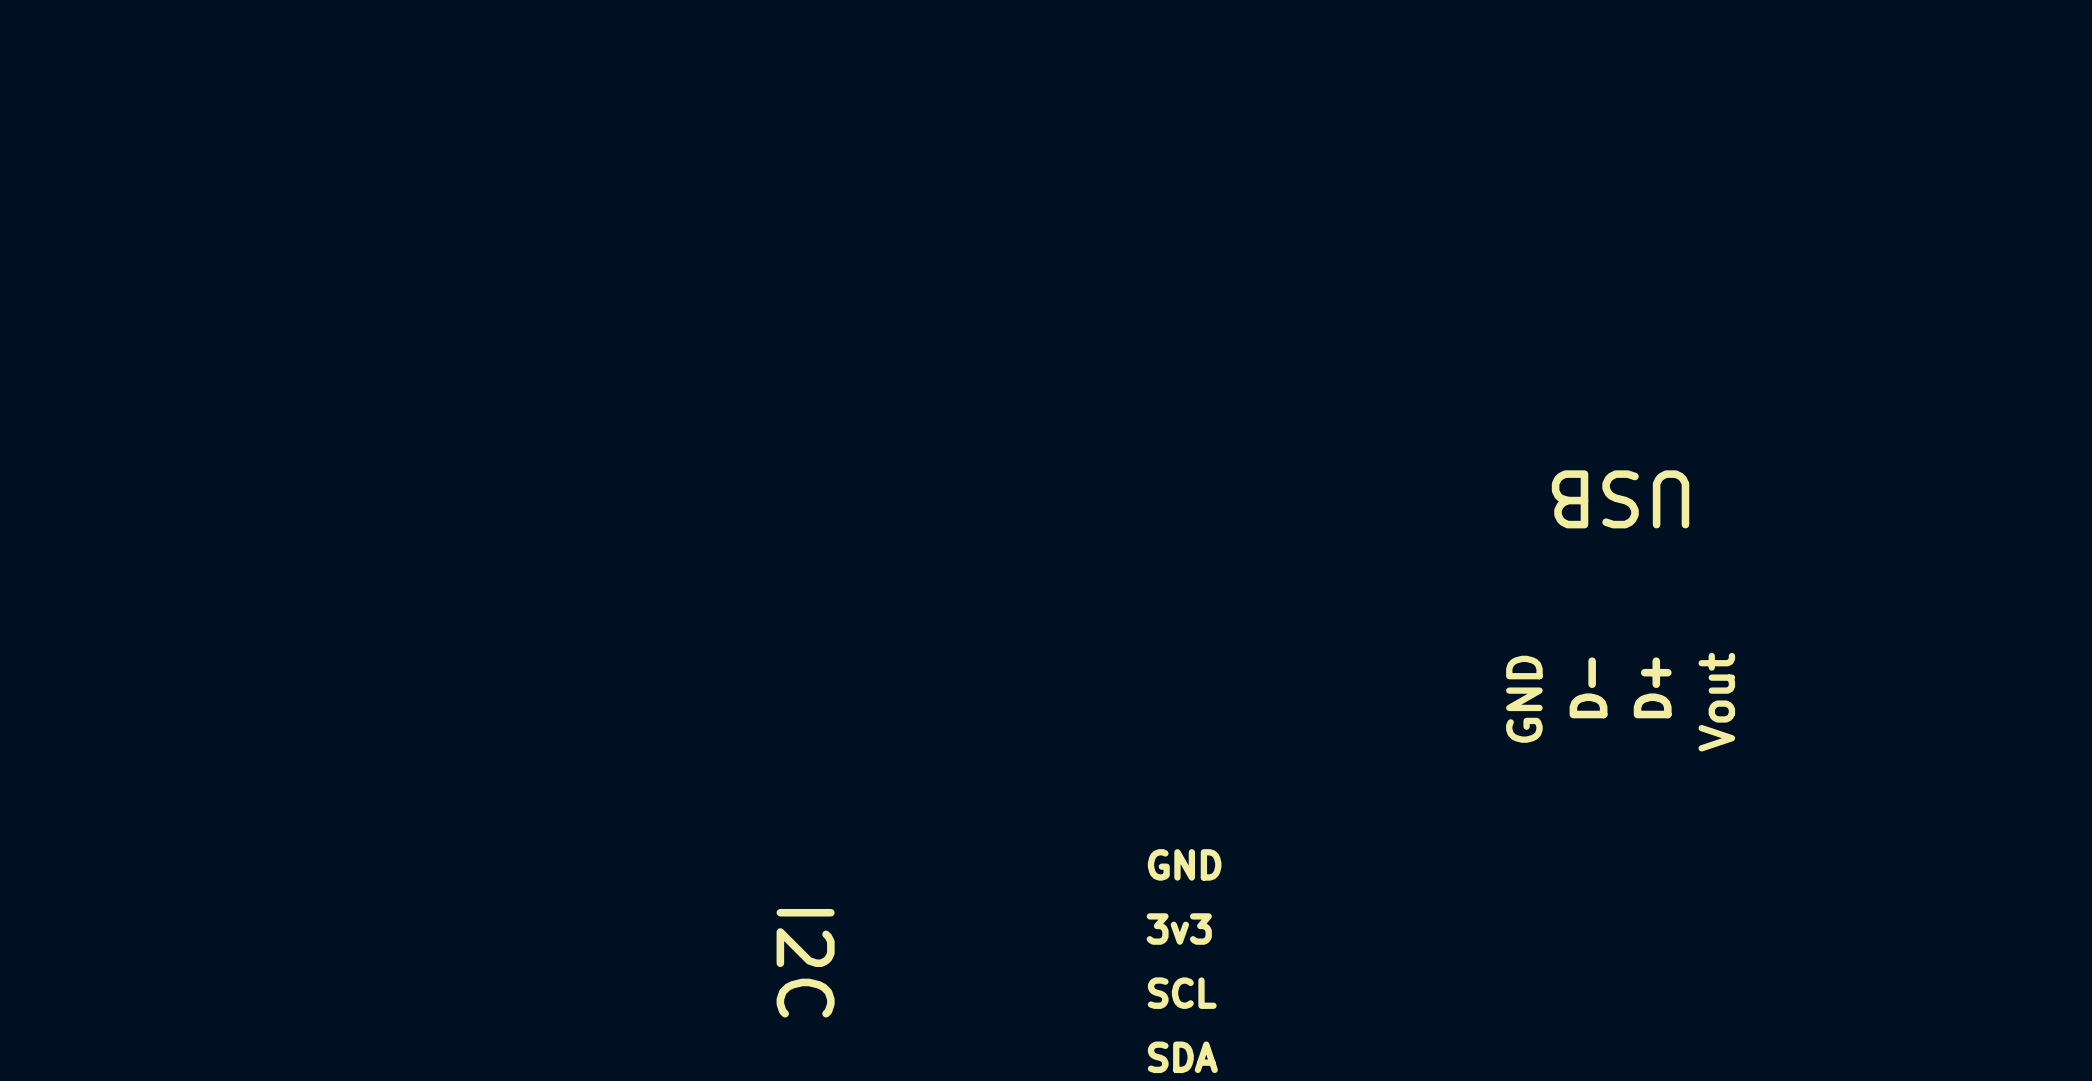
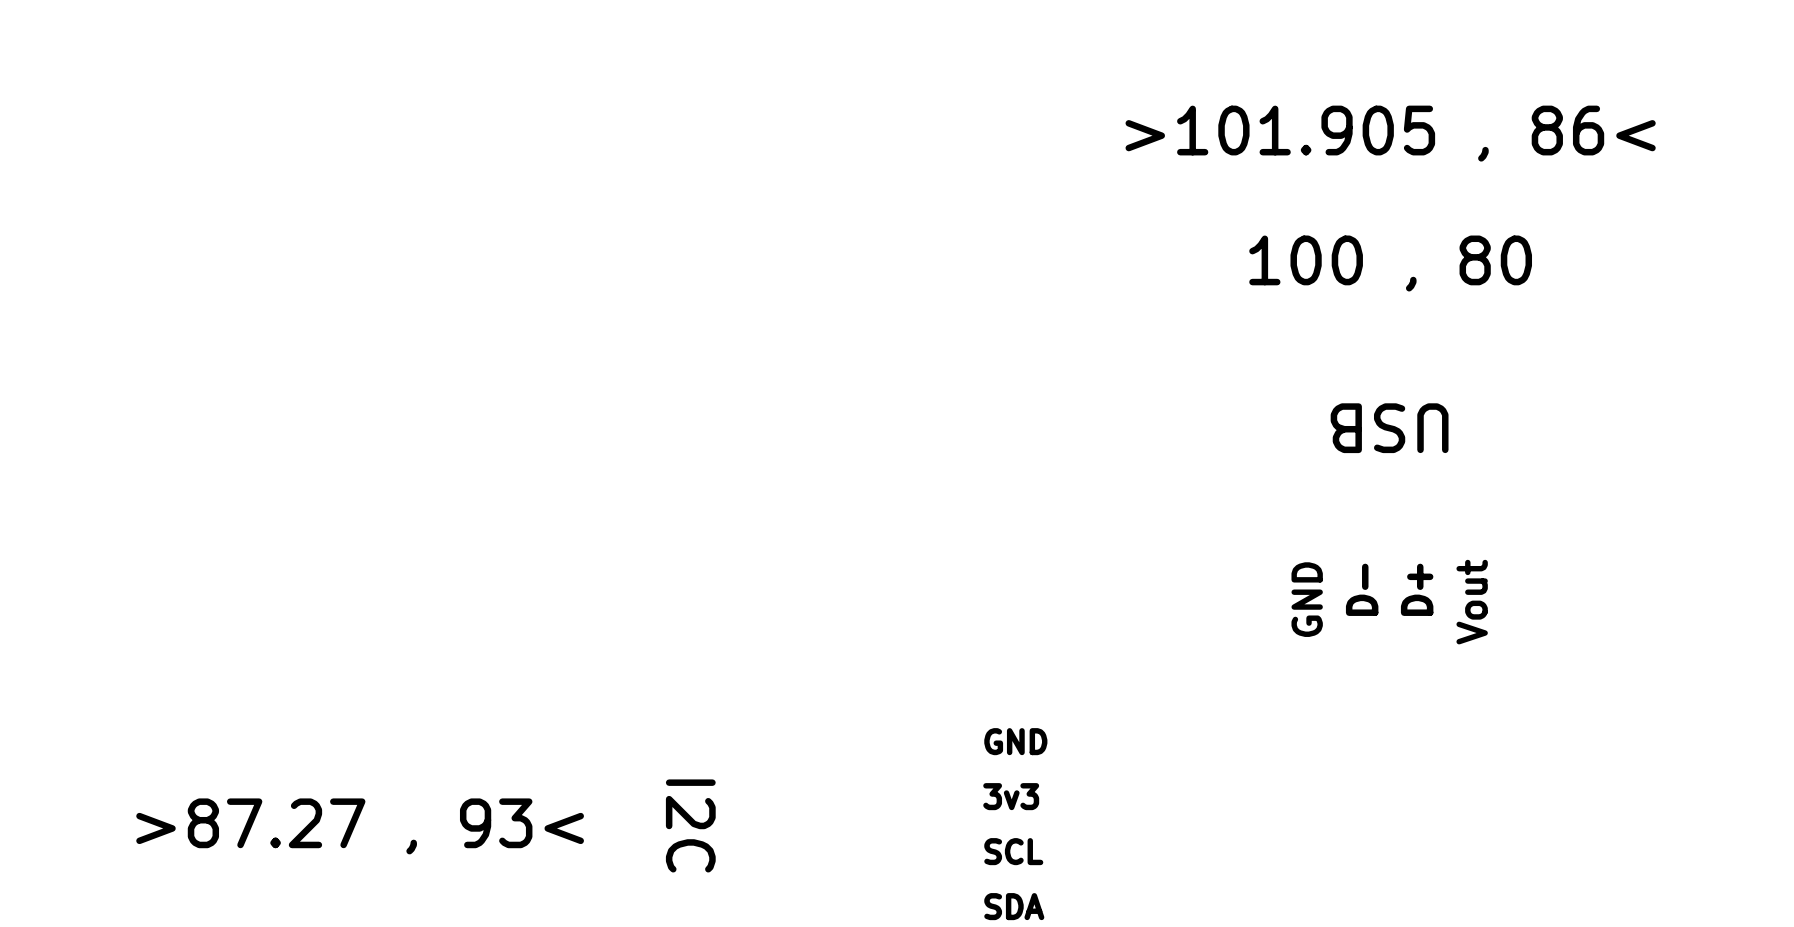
text: none -> >101.905 , 86< (1390, 133)
text: none -> 100 , 80 (1390, 263)
text: none -> >87.27 , 93< (360, 826)

